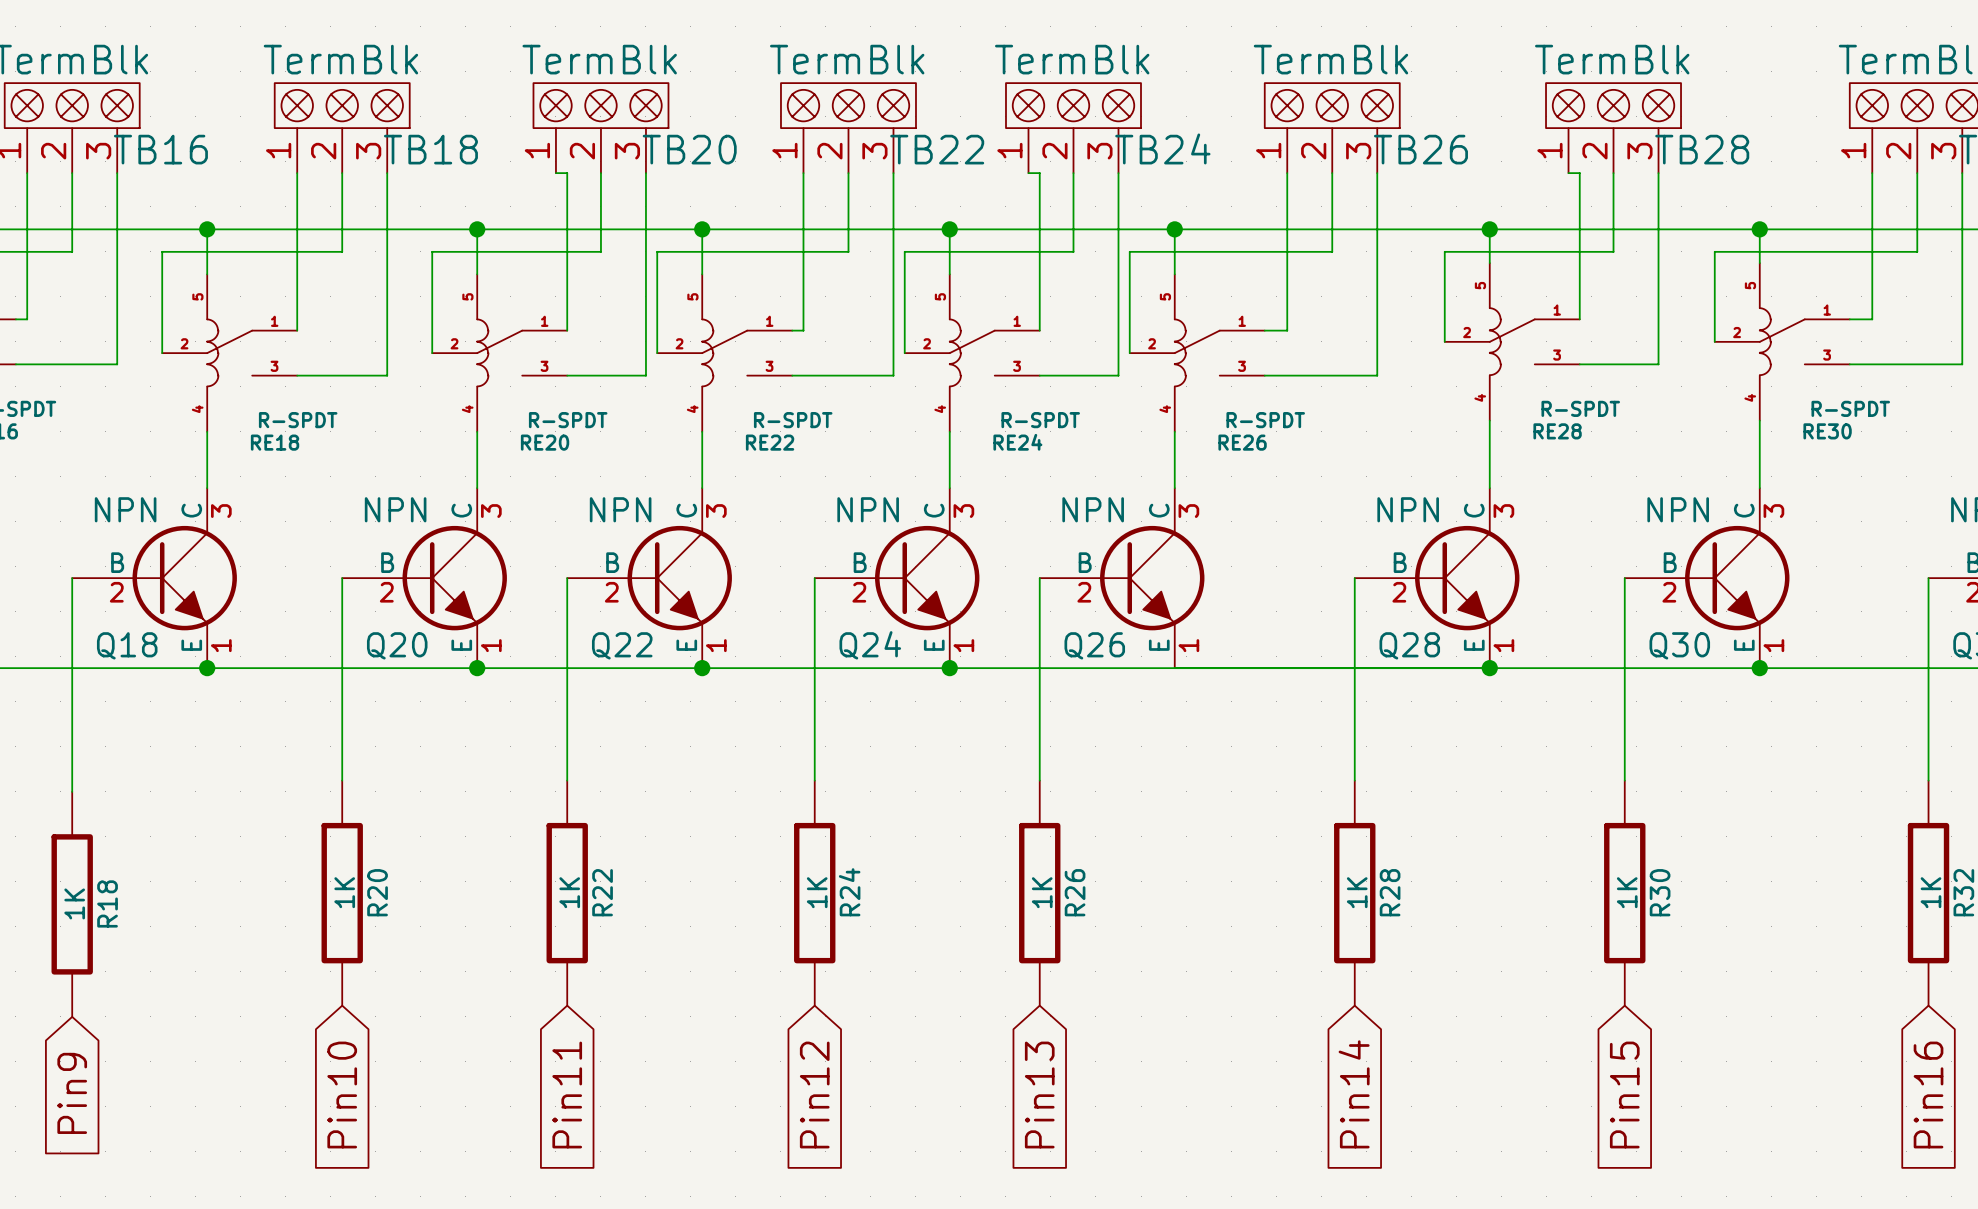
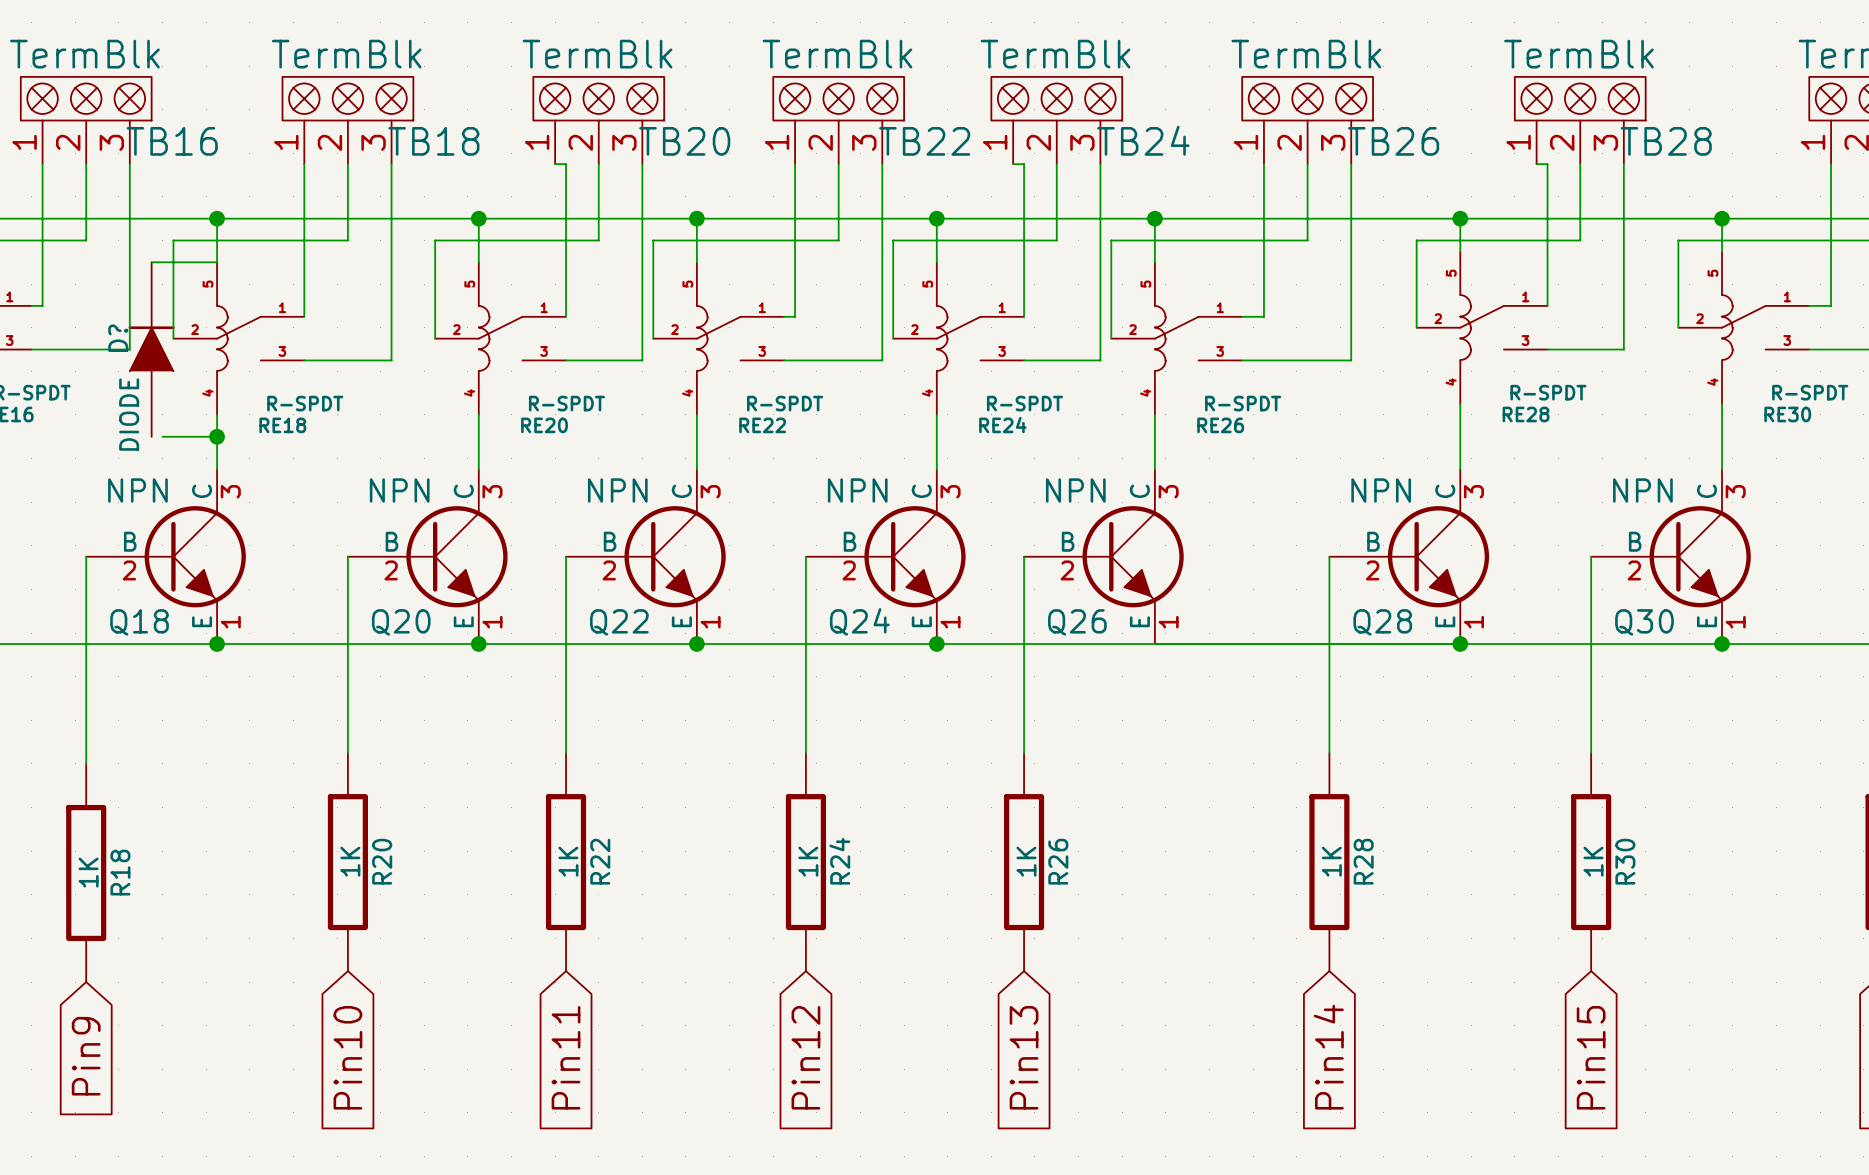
wire: none -> (151, 262) (217, 262)
D?: none -> DIODE (151, 349)
wire: none -> (162, 436) (217, 436)
junction: none -> (217, 436)

